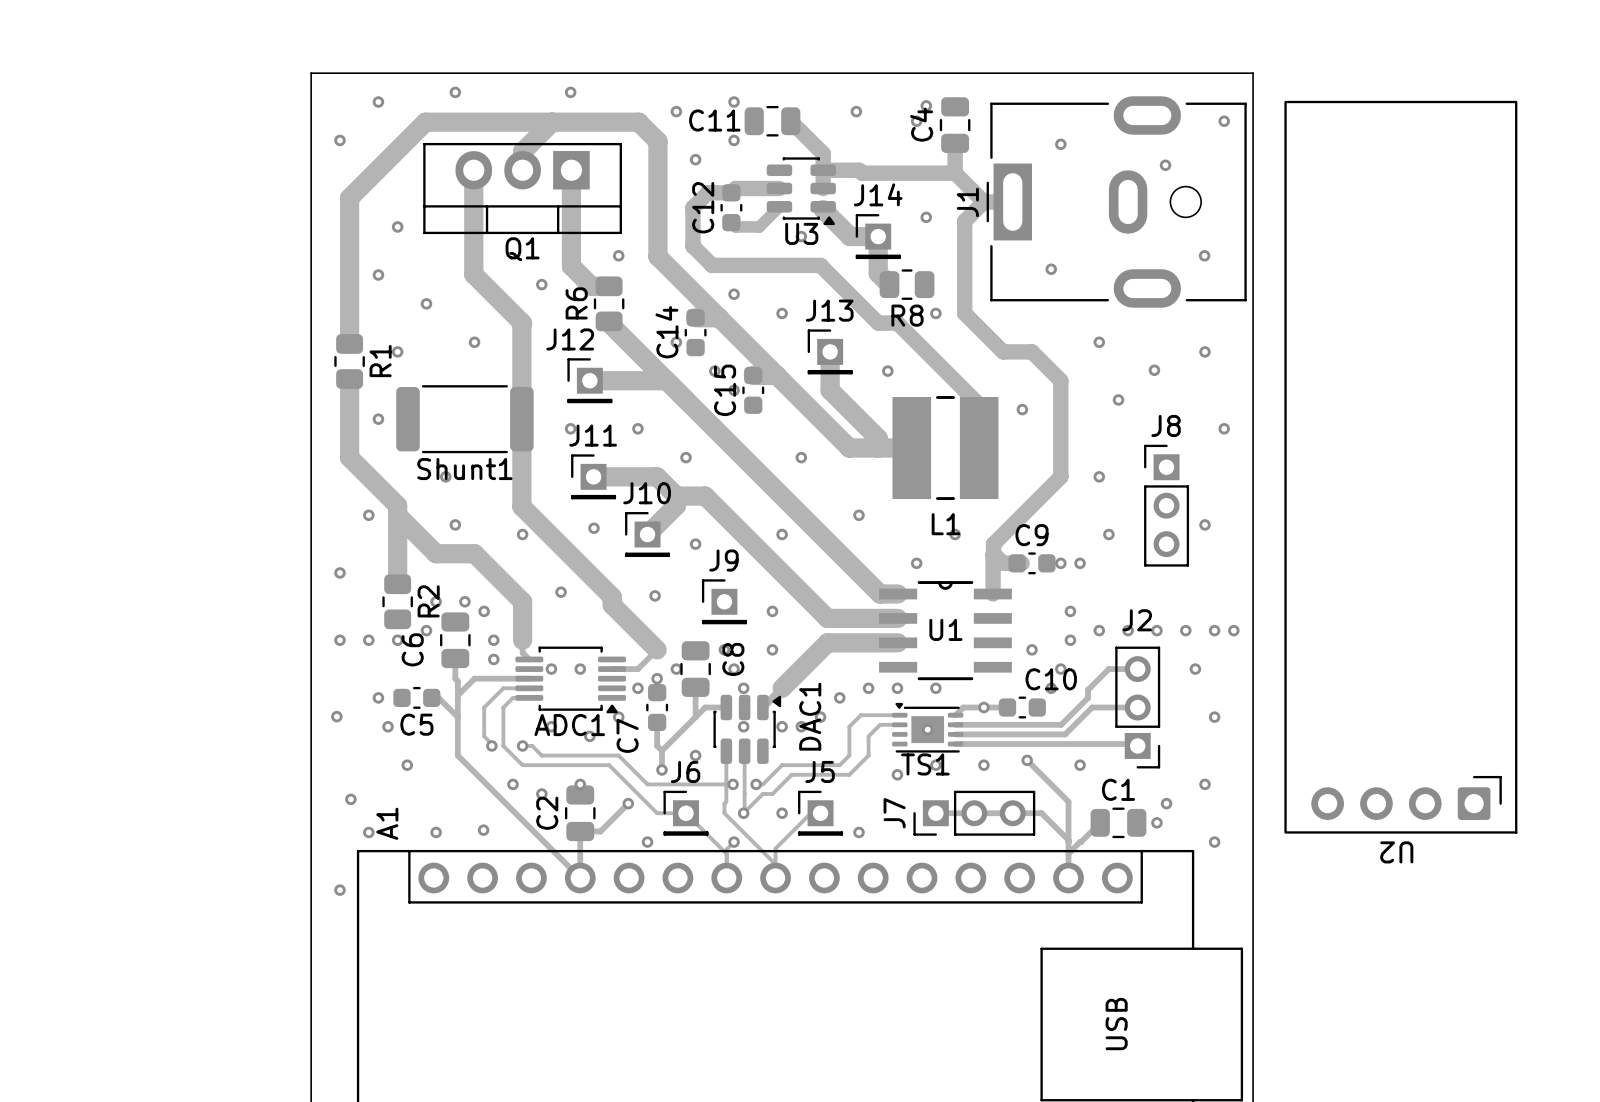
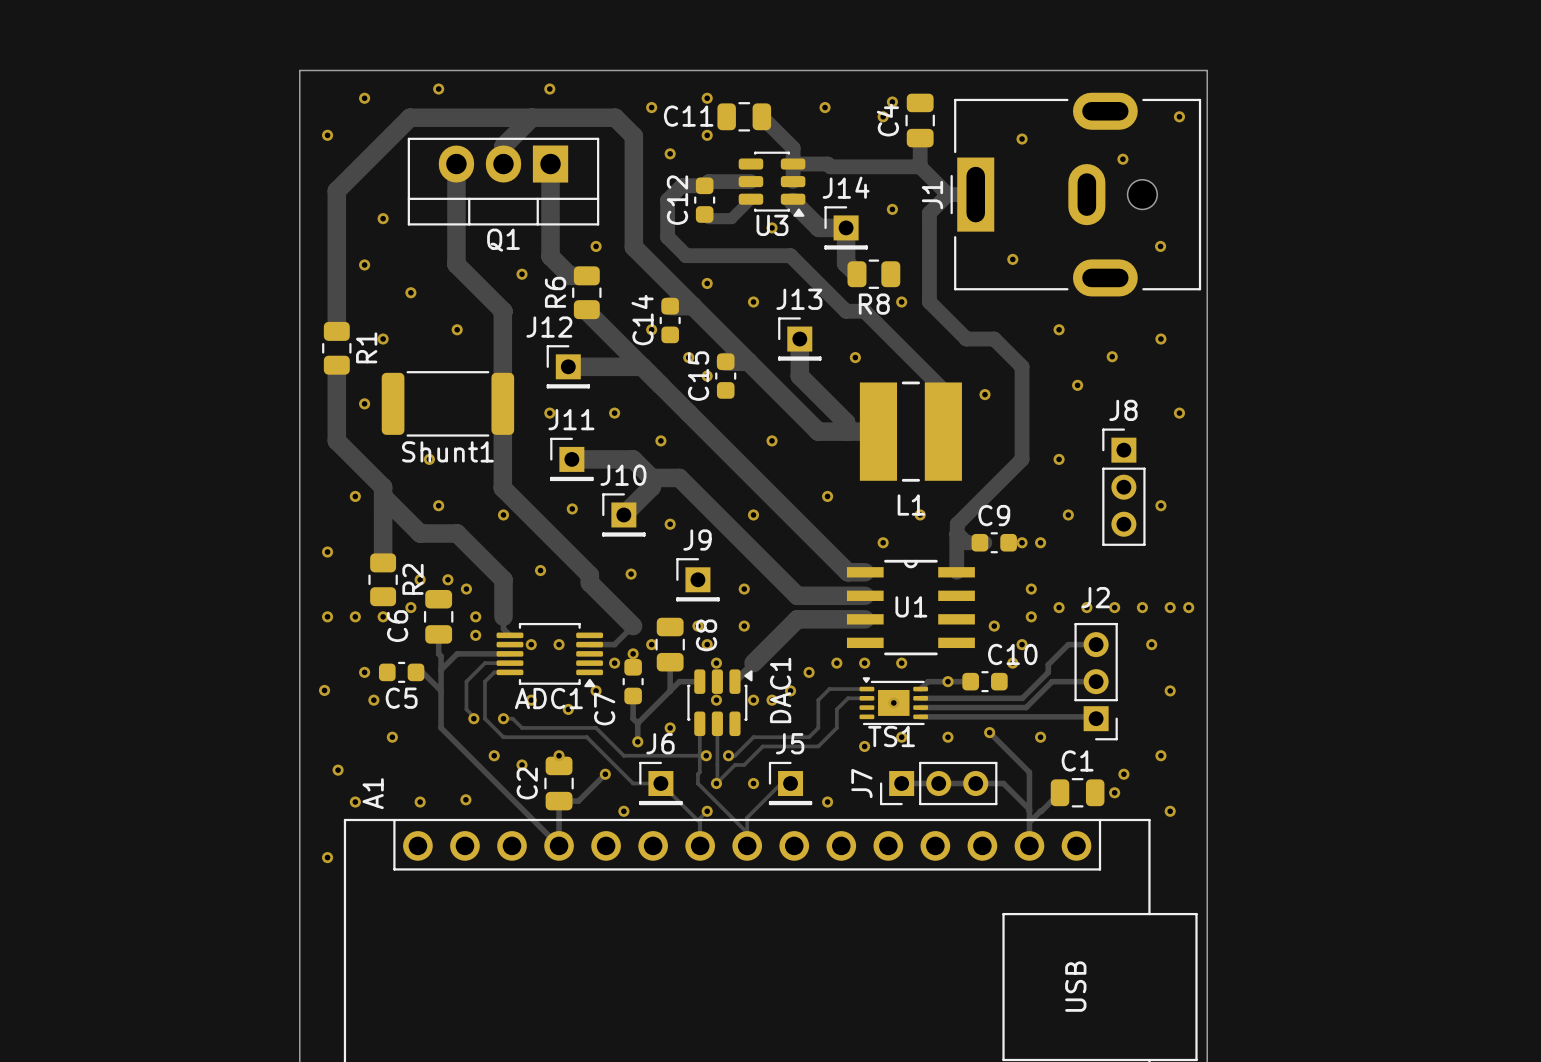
U2: (1400, 467) -> none

